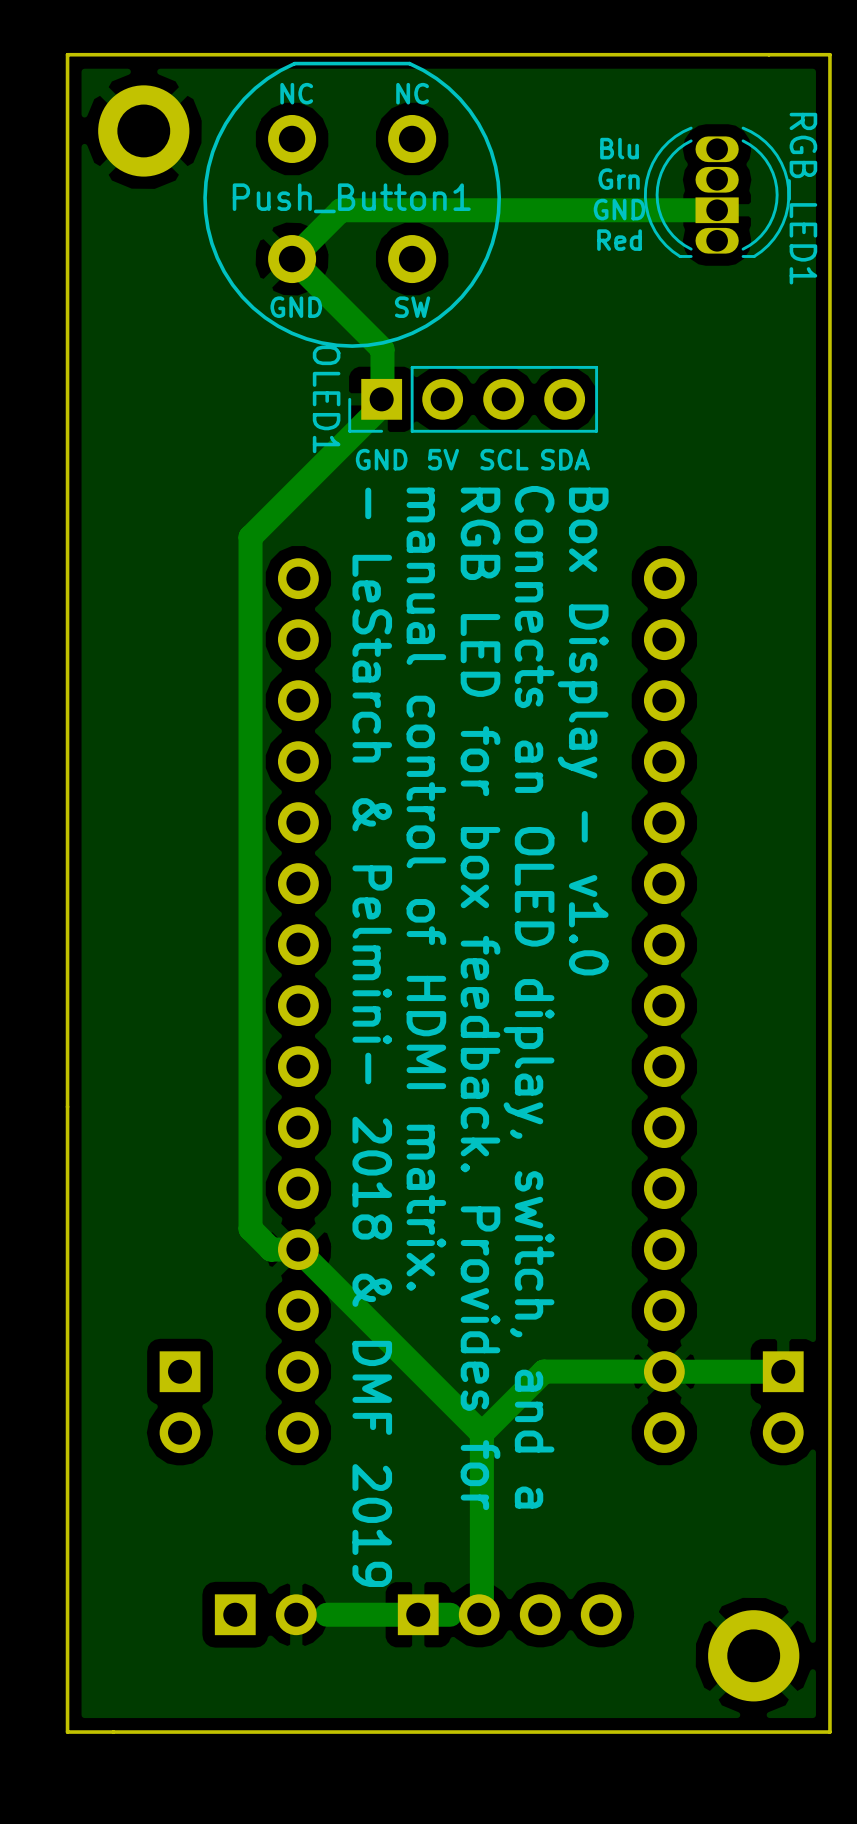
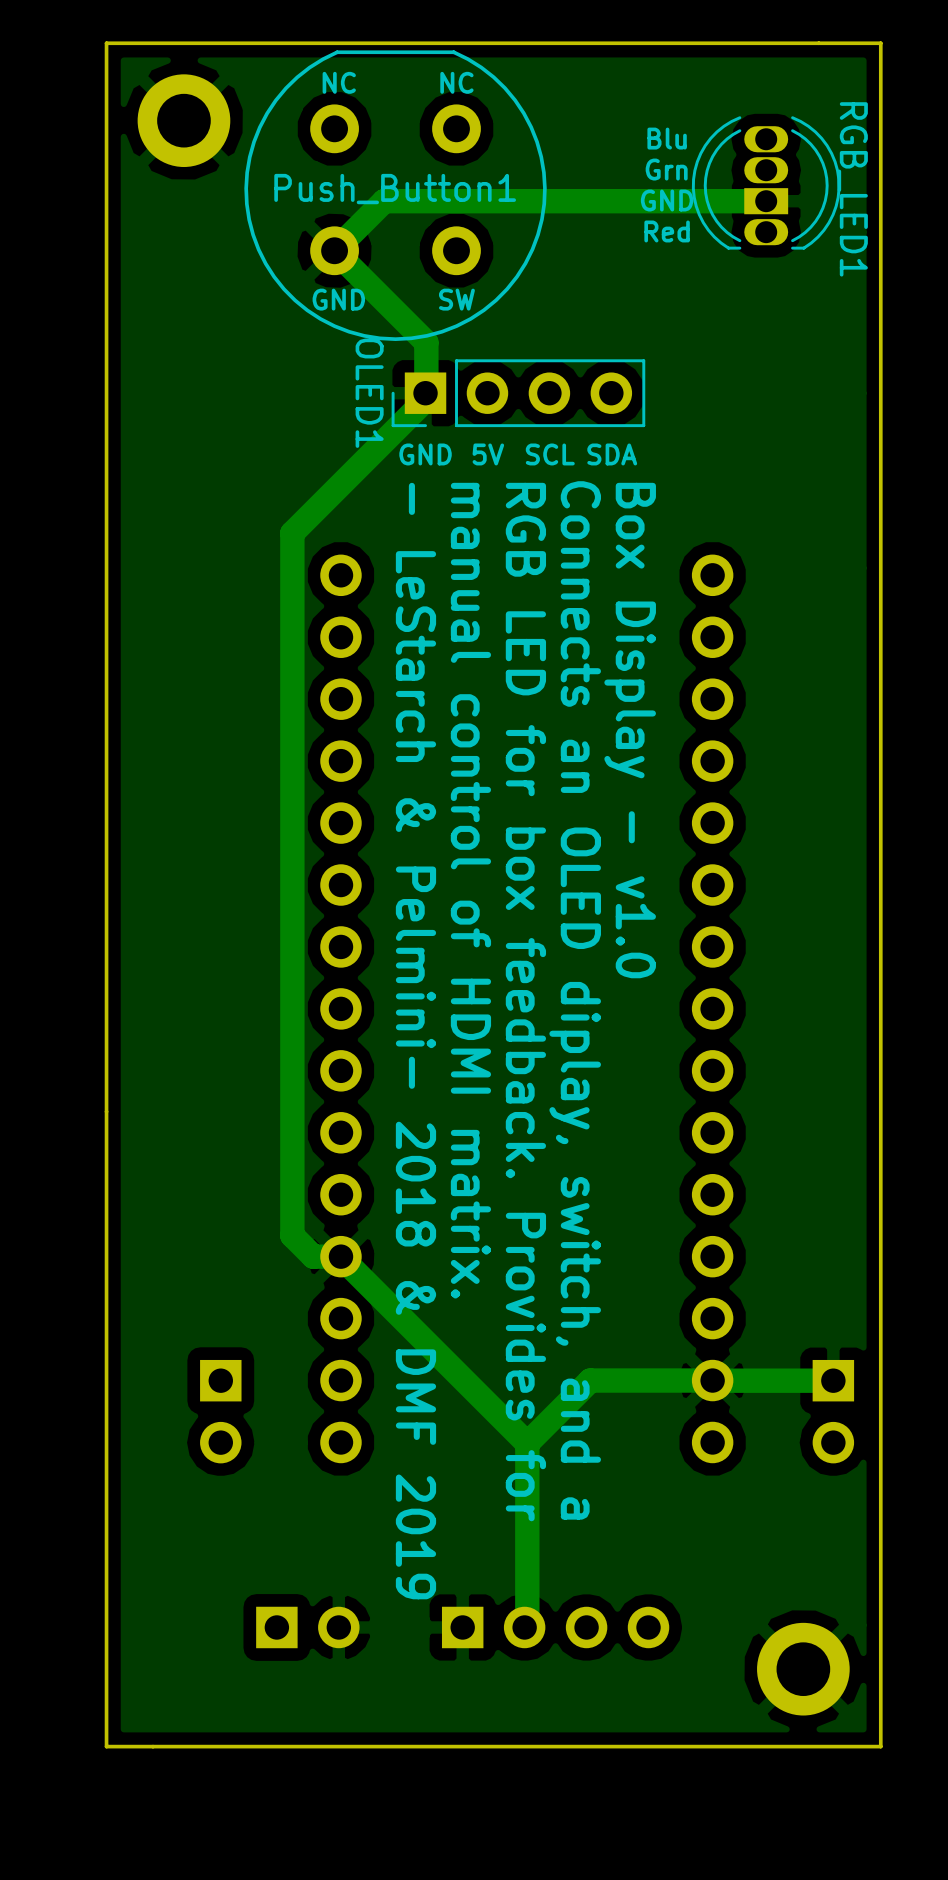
track: (450, 1614) (326, 1614) -> none

